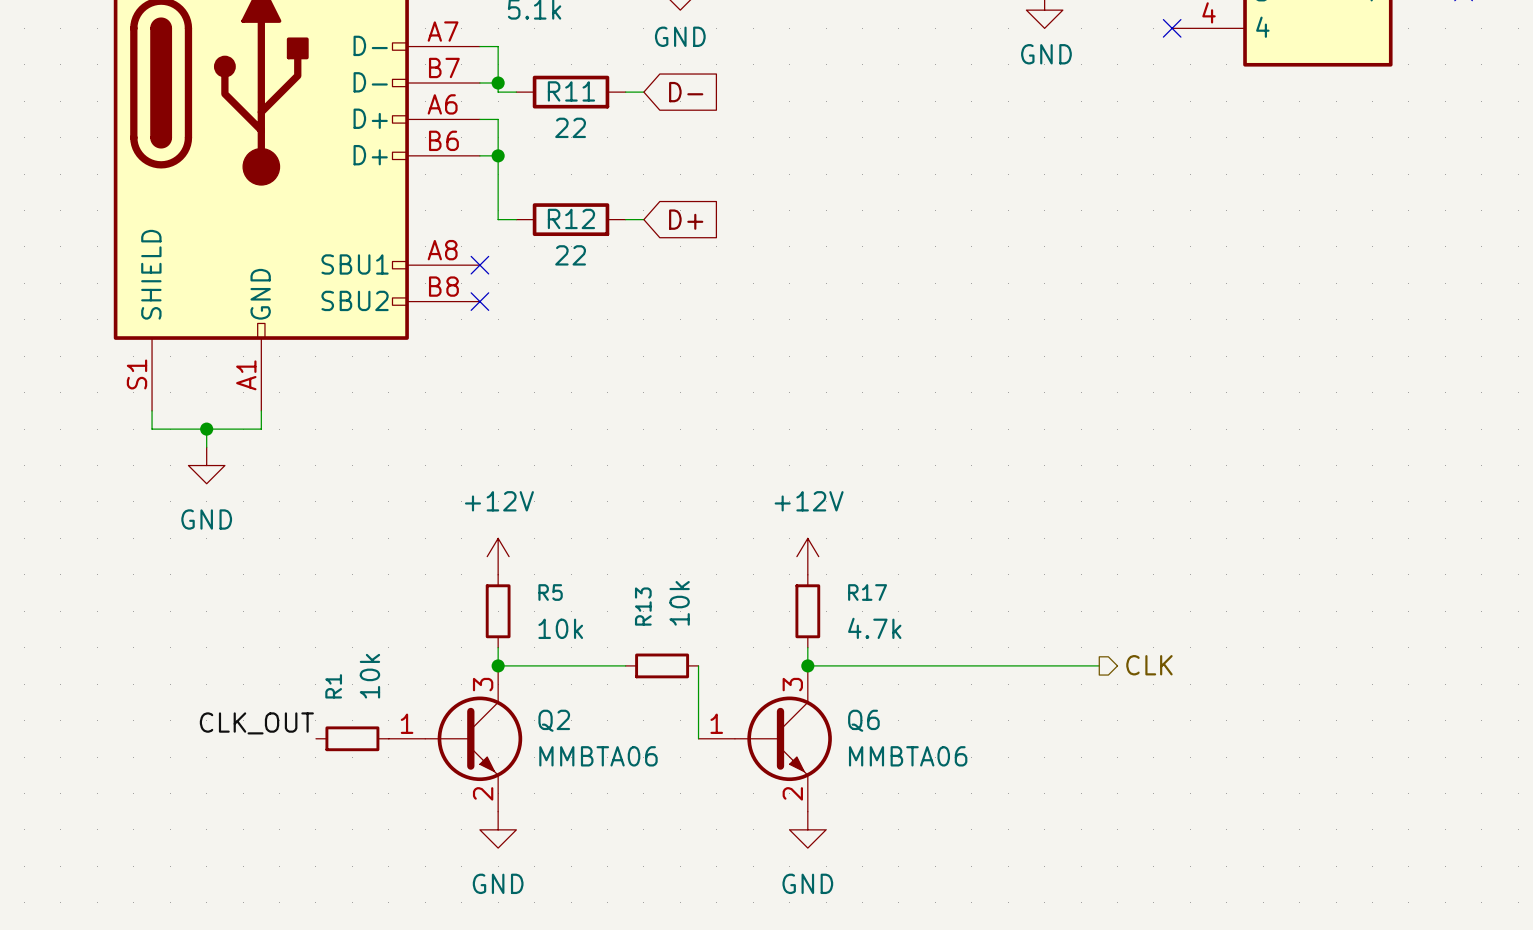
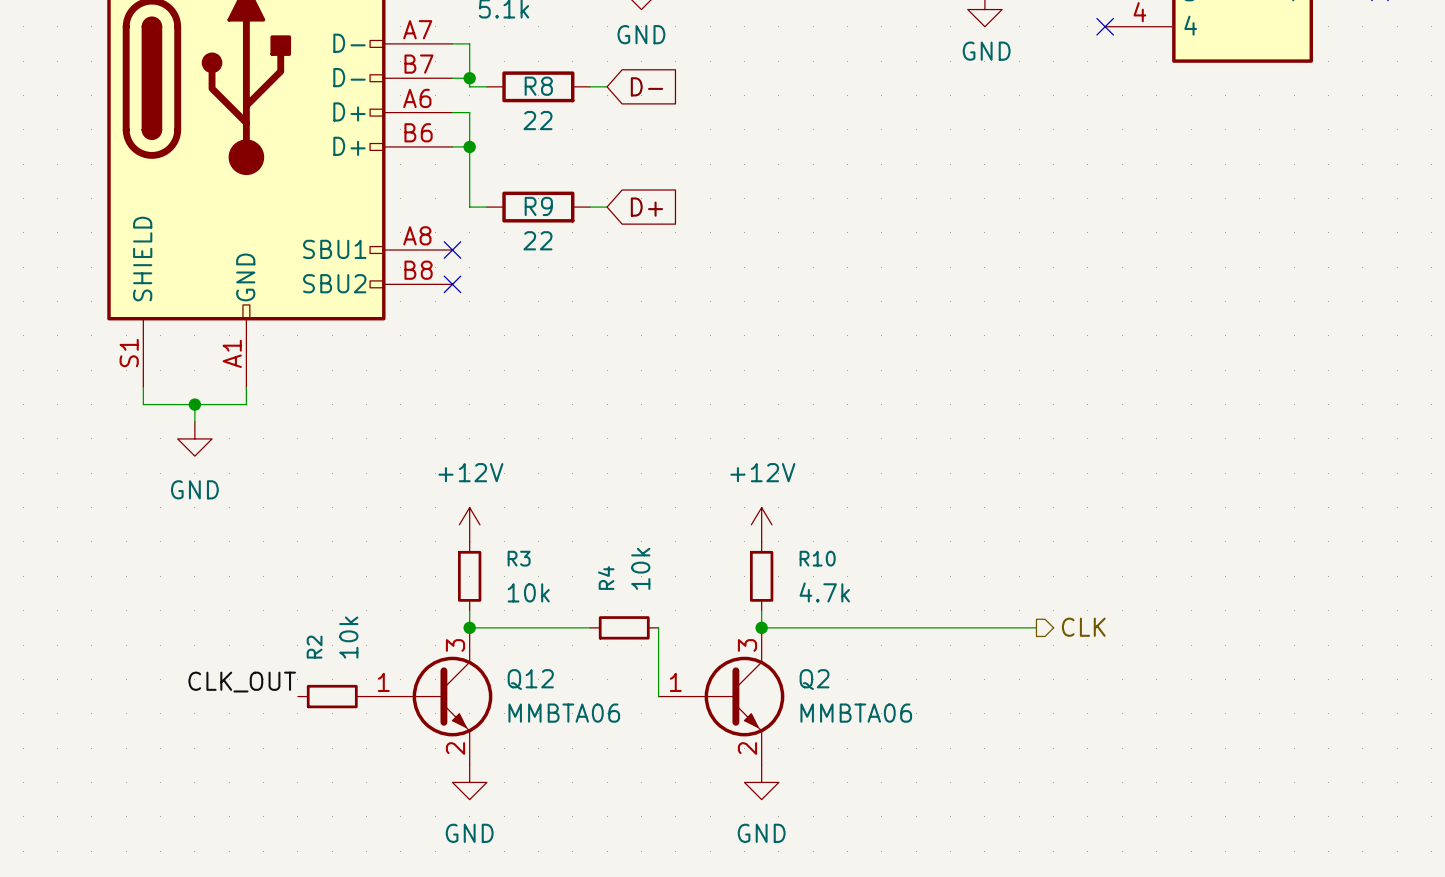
R11 name: R11 (571, 91) -> R8 (538, 86)
R12 name: R12 (571, 218) -> R9 (538, 206)
R5 name: R5 (550, 592) -> R3 (519, 558)
R17 name: R17 (867, 592) -> R10 (817, 558)
R13 name: R13 (643, 606) -> R4 (606, 578)
R1 name: R1 (333, 686) -> R2 (314, 647)
Q2 name: Q2 (554, 720) -> Q12 (530, 679)
Q6 name: Q6 (863, 720) -> Q2 (814, 679)

